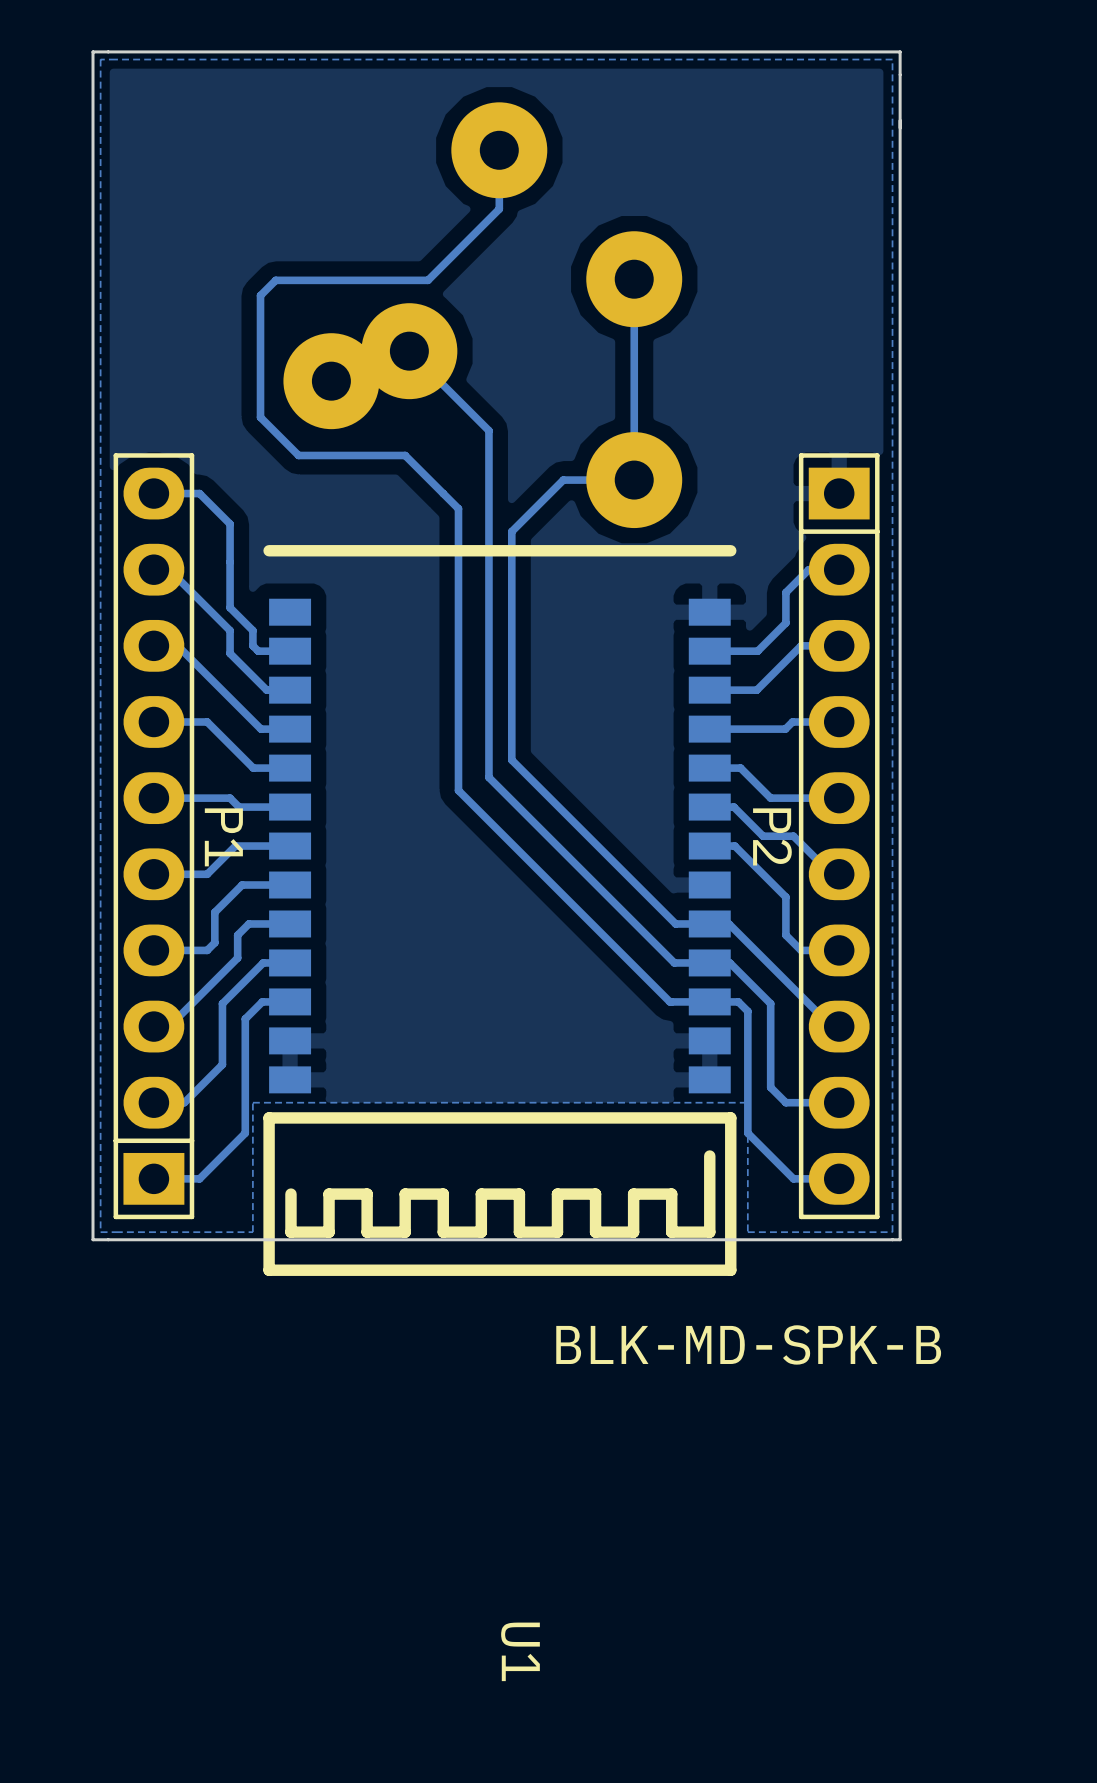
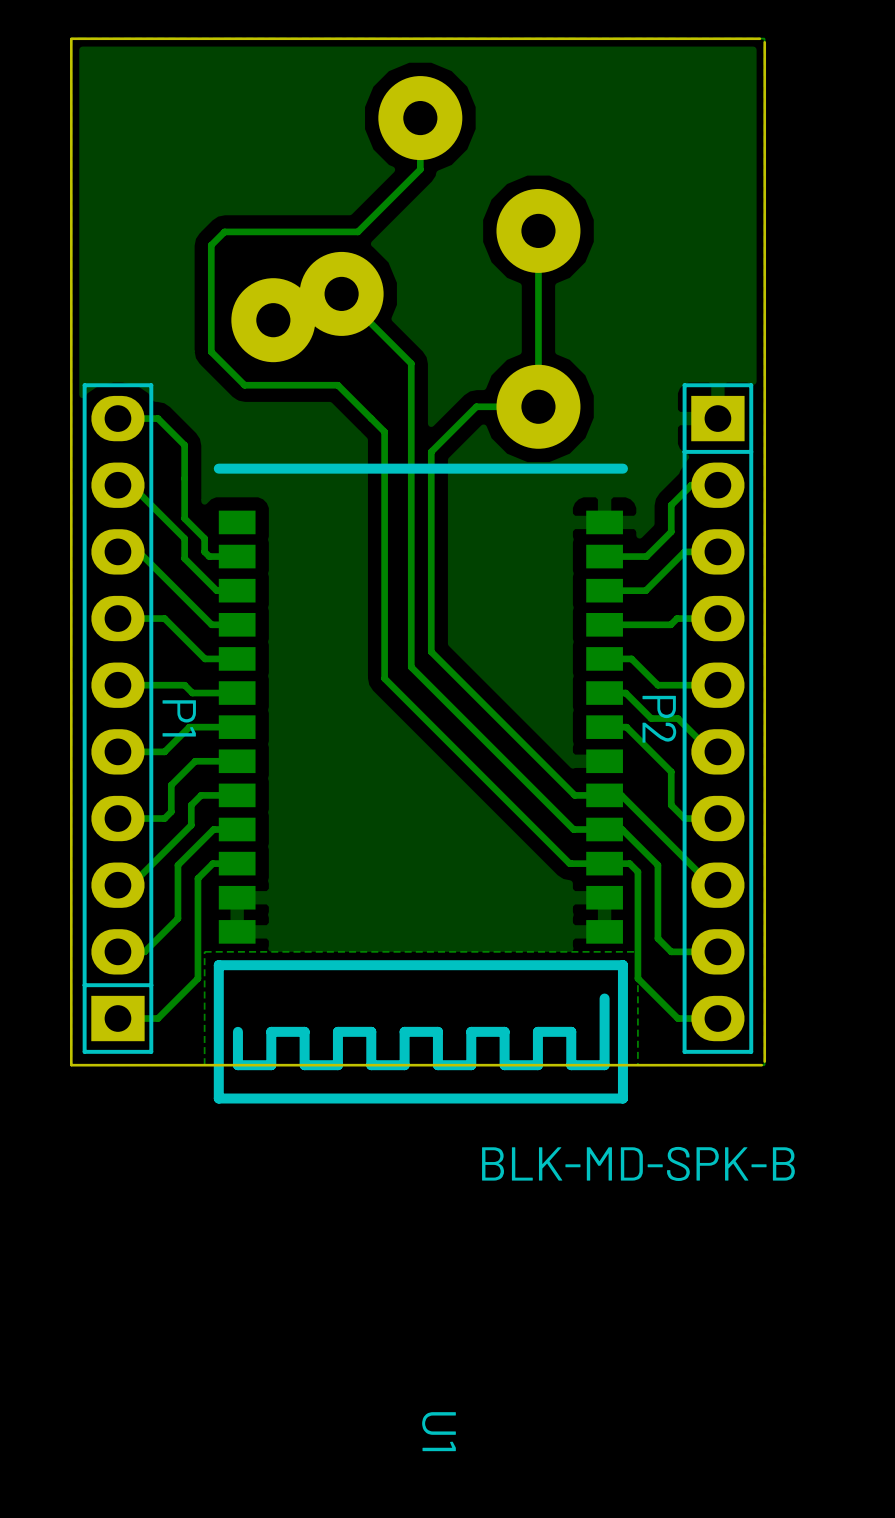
board edge: (900, 51) (93, 51) (93, 1239) (900, 1239) (900, 51) -> none
board edge: none -> (759, 38) (71, 38)
board edge: none -> (71, 39) (71, 1065)
board edge: none -> (764, 42) (764, 1061)
board edge: none -> (761, 1065) (71, 1065)

